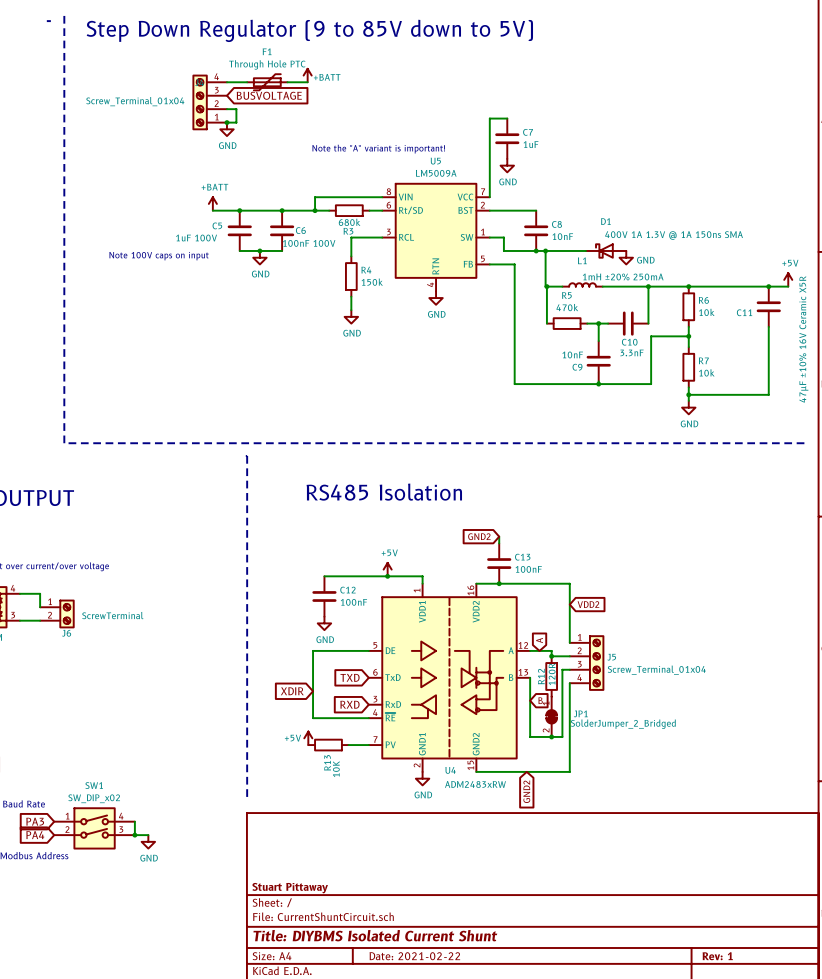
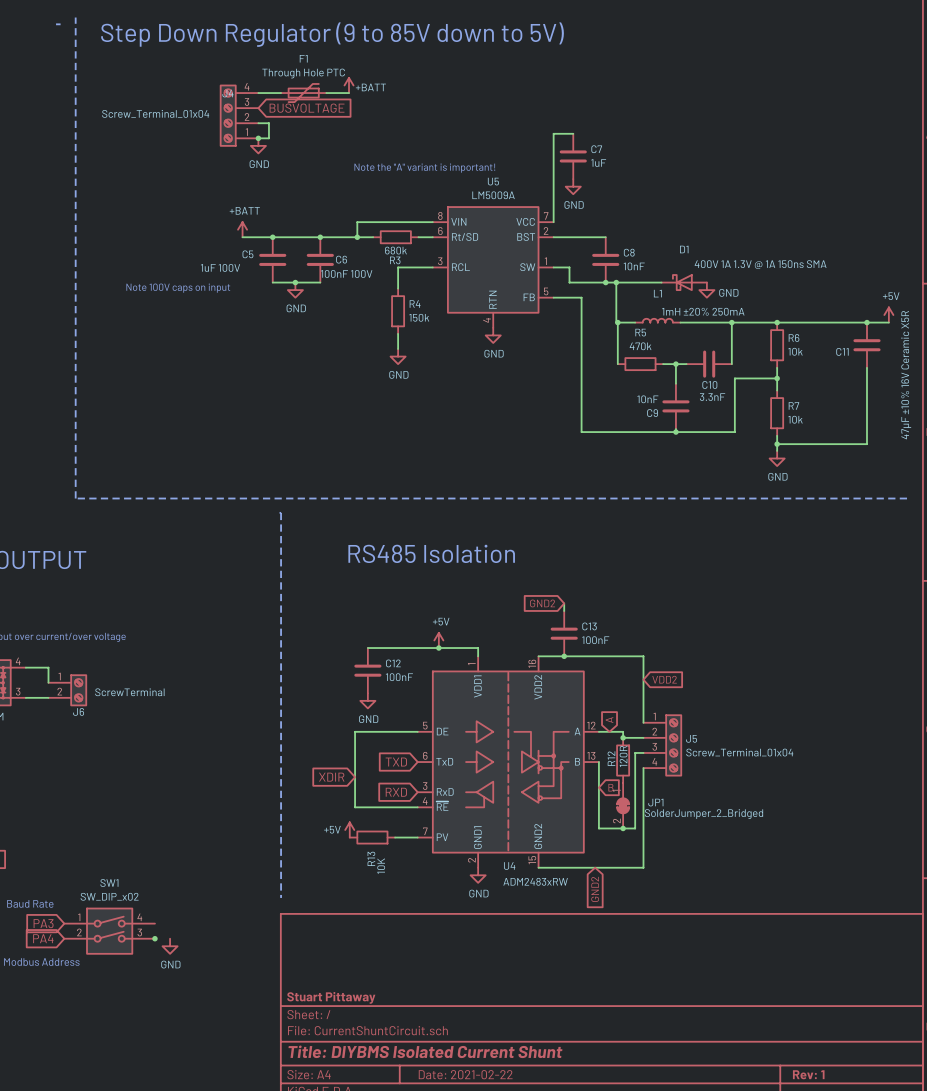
wire: (134, 821) (134, 835) (148, 835) -> none

